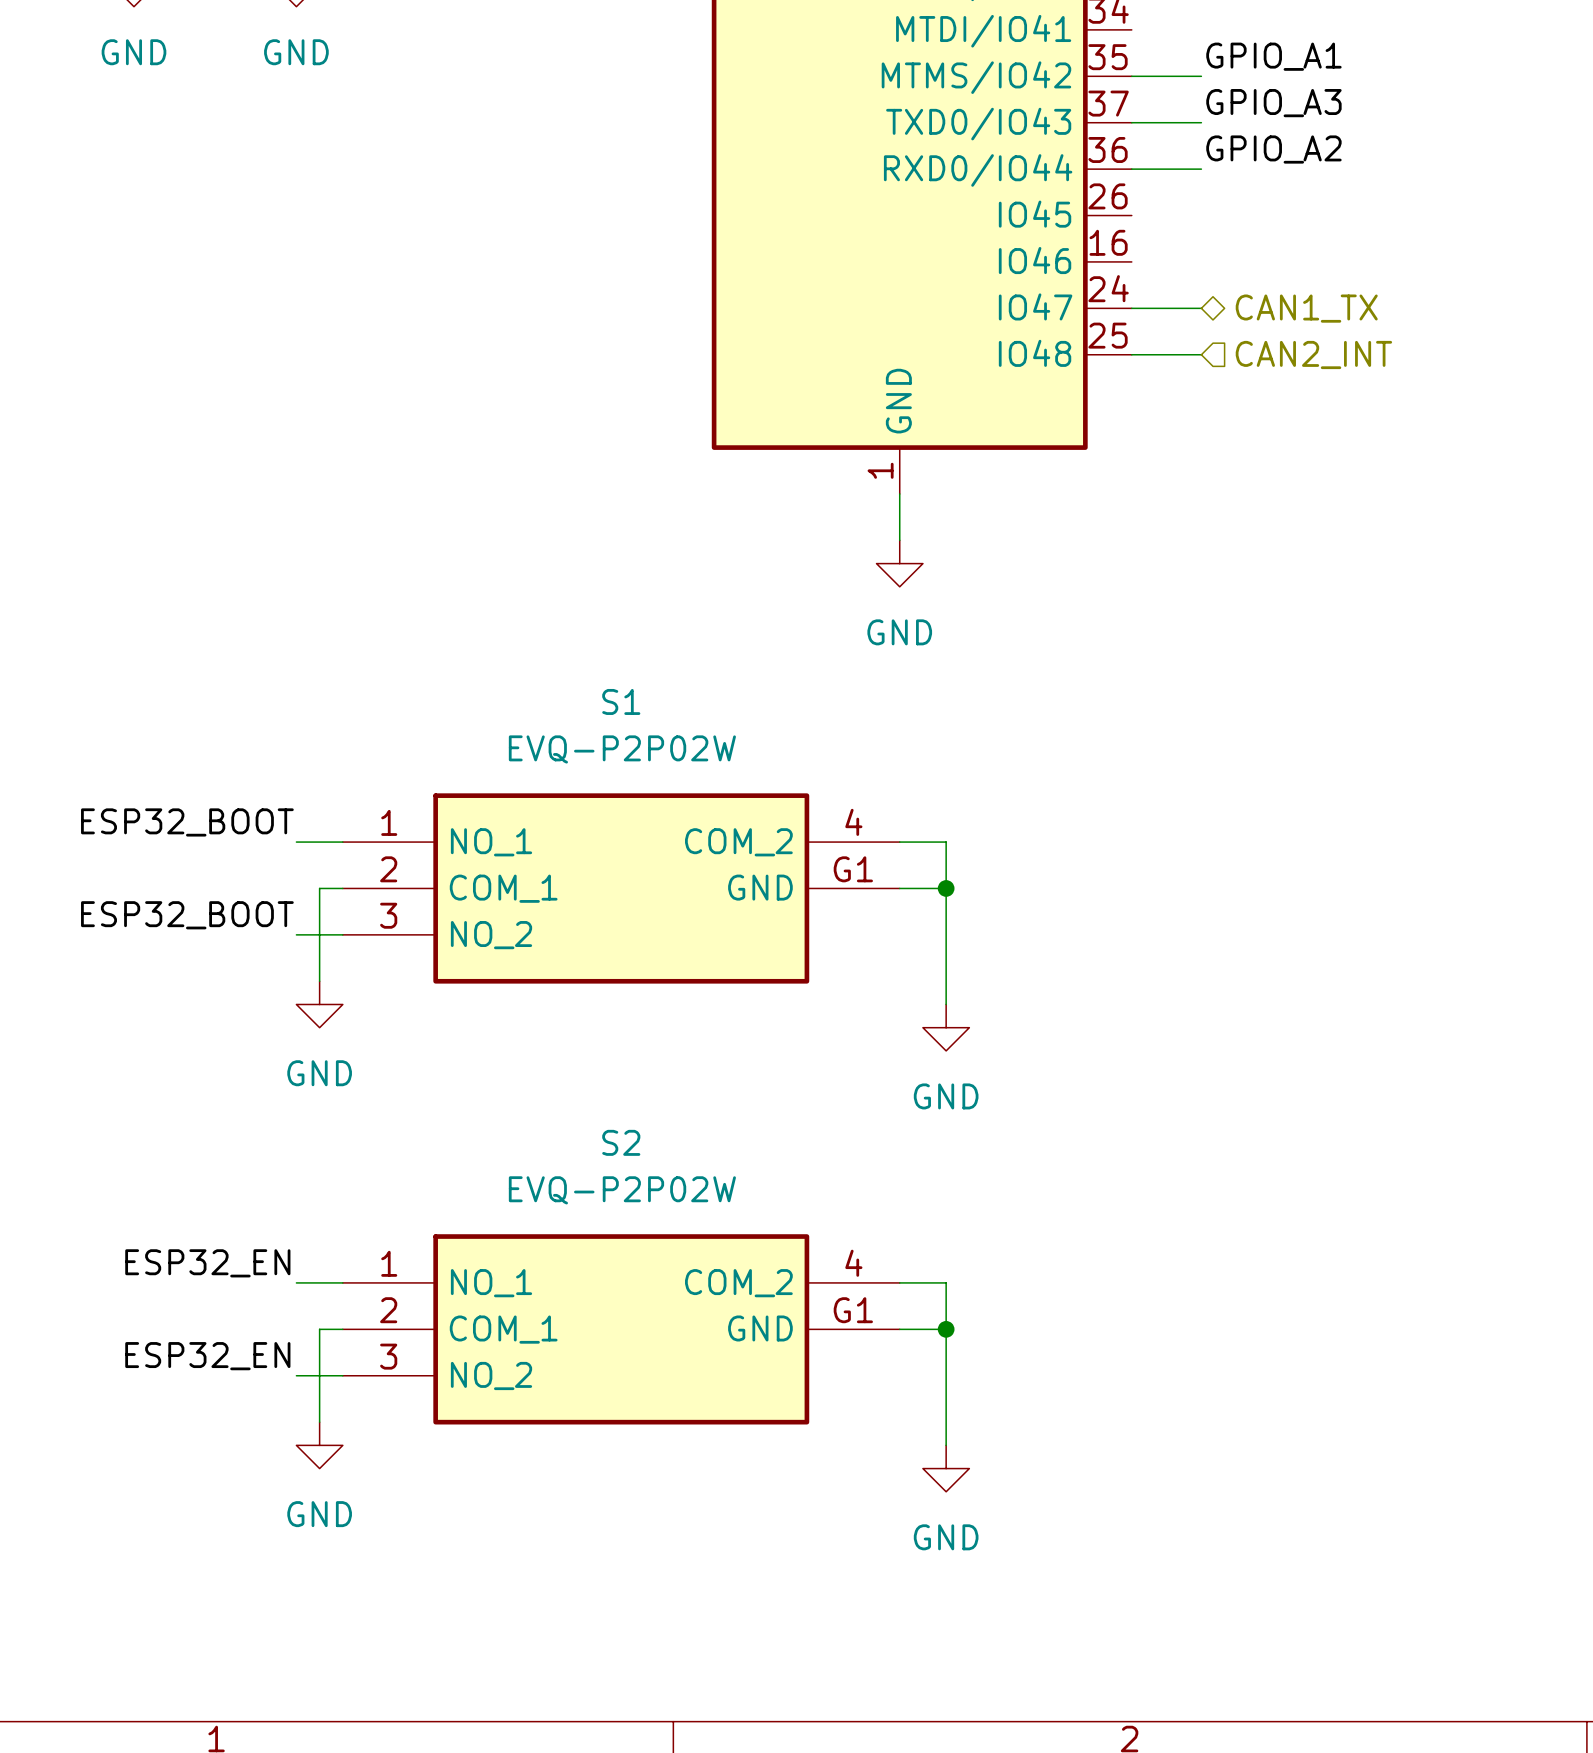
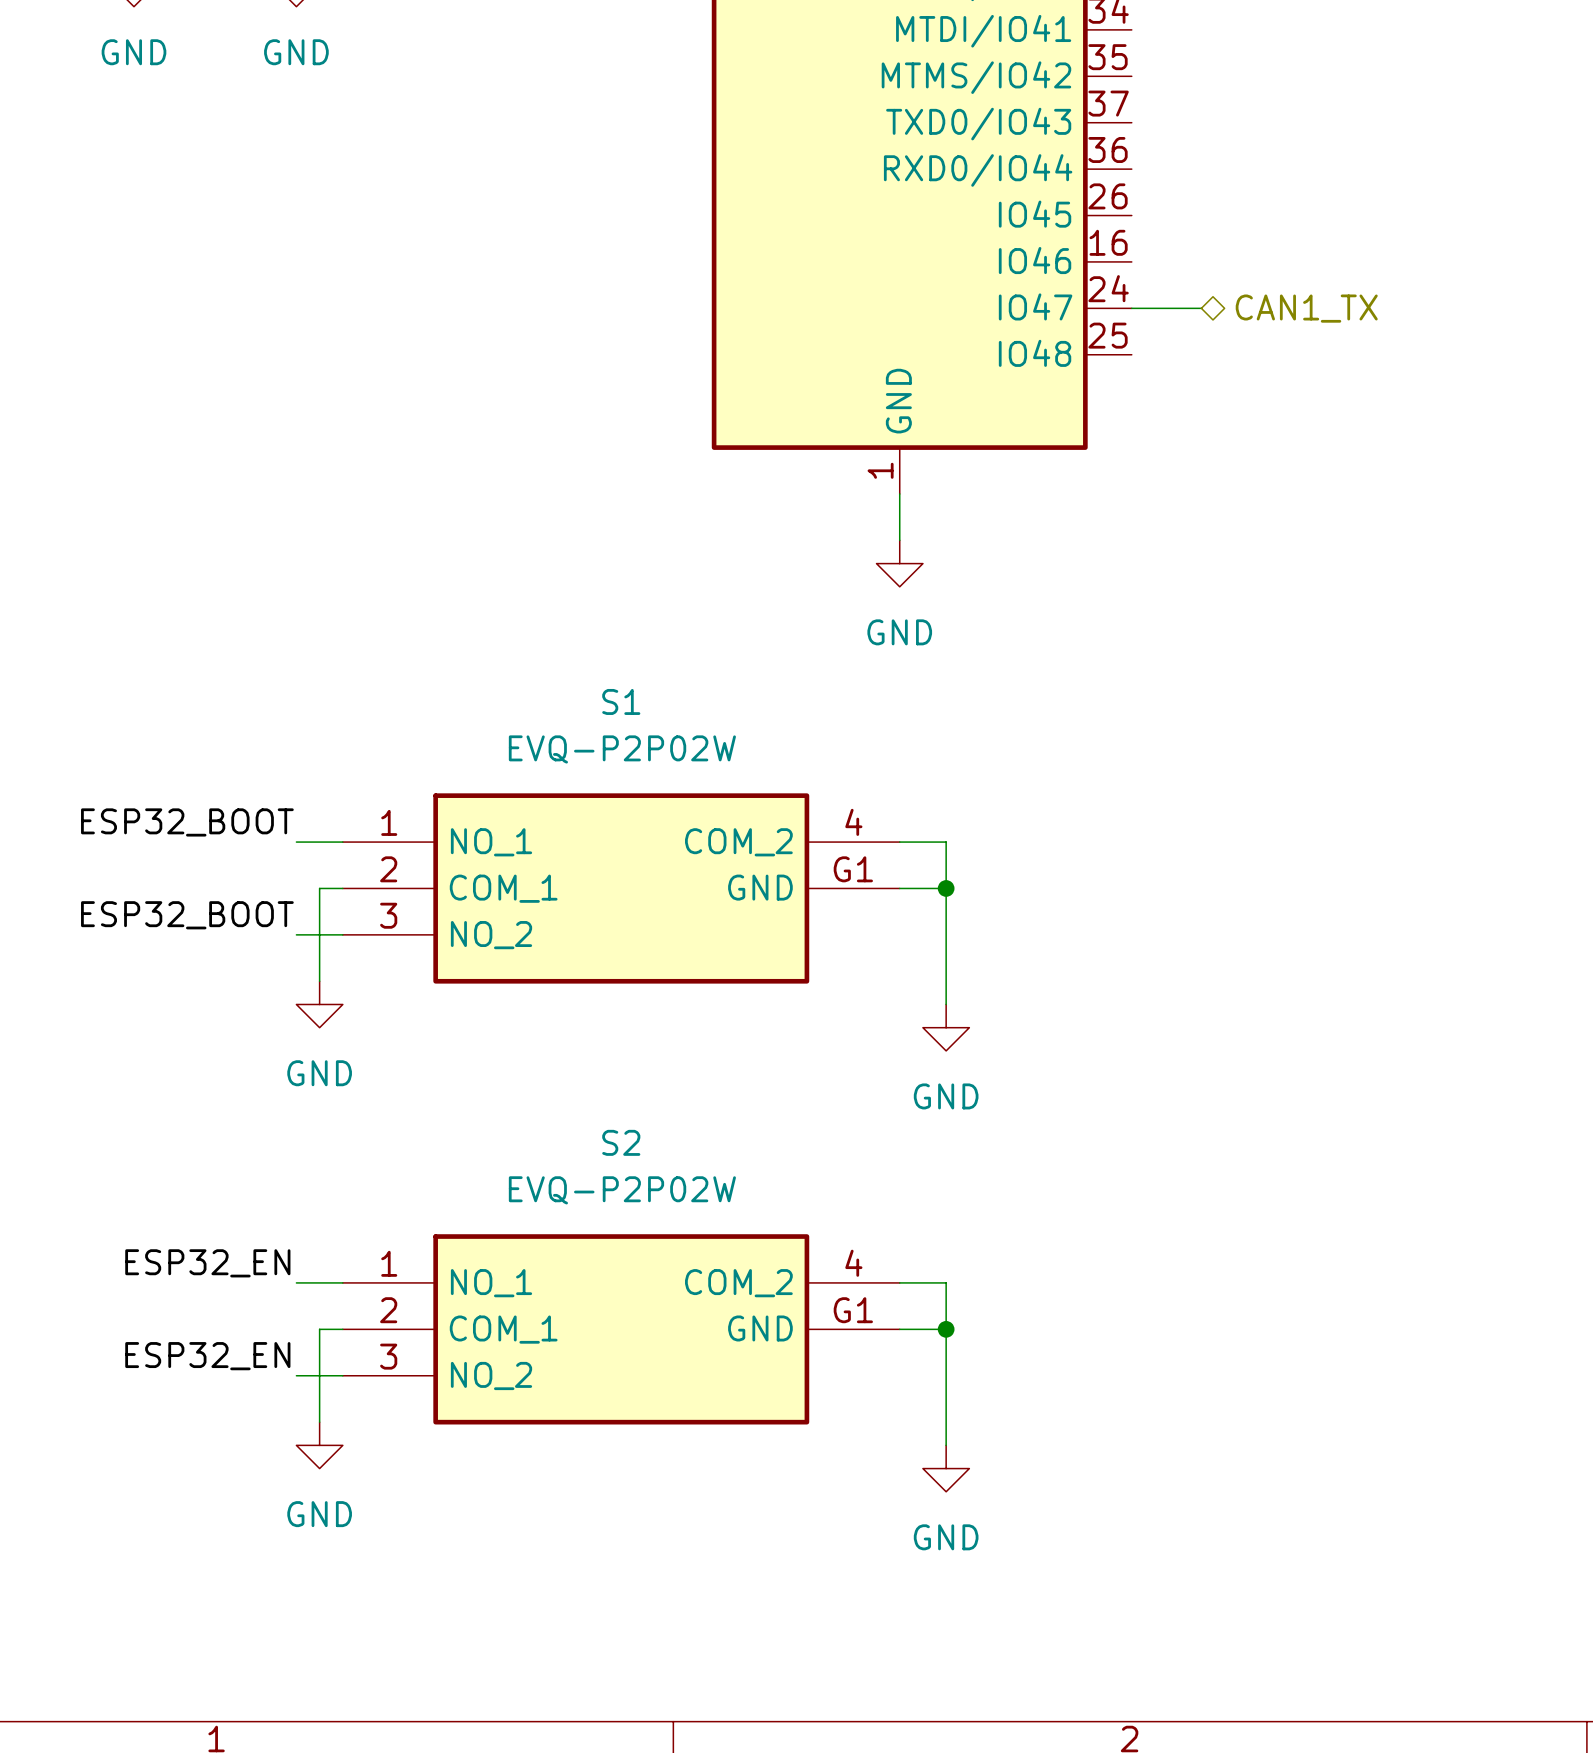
label: GPIO_A1 (1273, 56) -> none
wire: (1131, 76) (1201, 76) -> none
label: GPIO_A3 (1273, 103) -> none
wire: (1131, 122) (1201, 122) -> none
label: GPIO_A2 (1273, 149) -> none
wire: (1131, 169) (1201, 169) -> none
wire: (1131, 354) (1201, 354) -> none
hierarchical label: CAN2_INT (1313, 355) -> none

